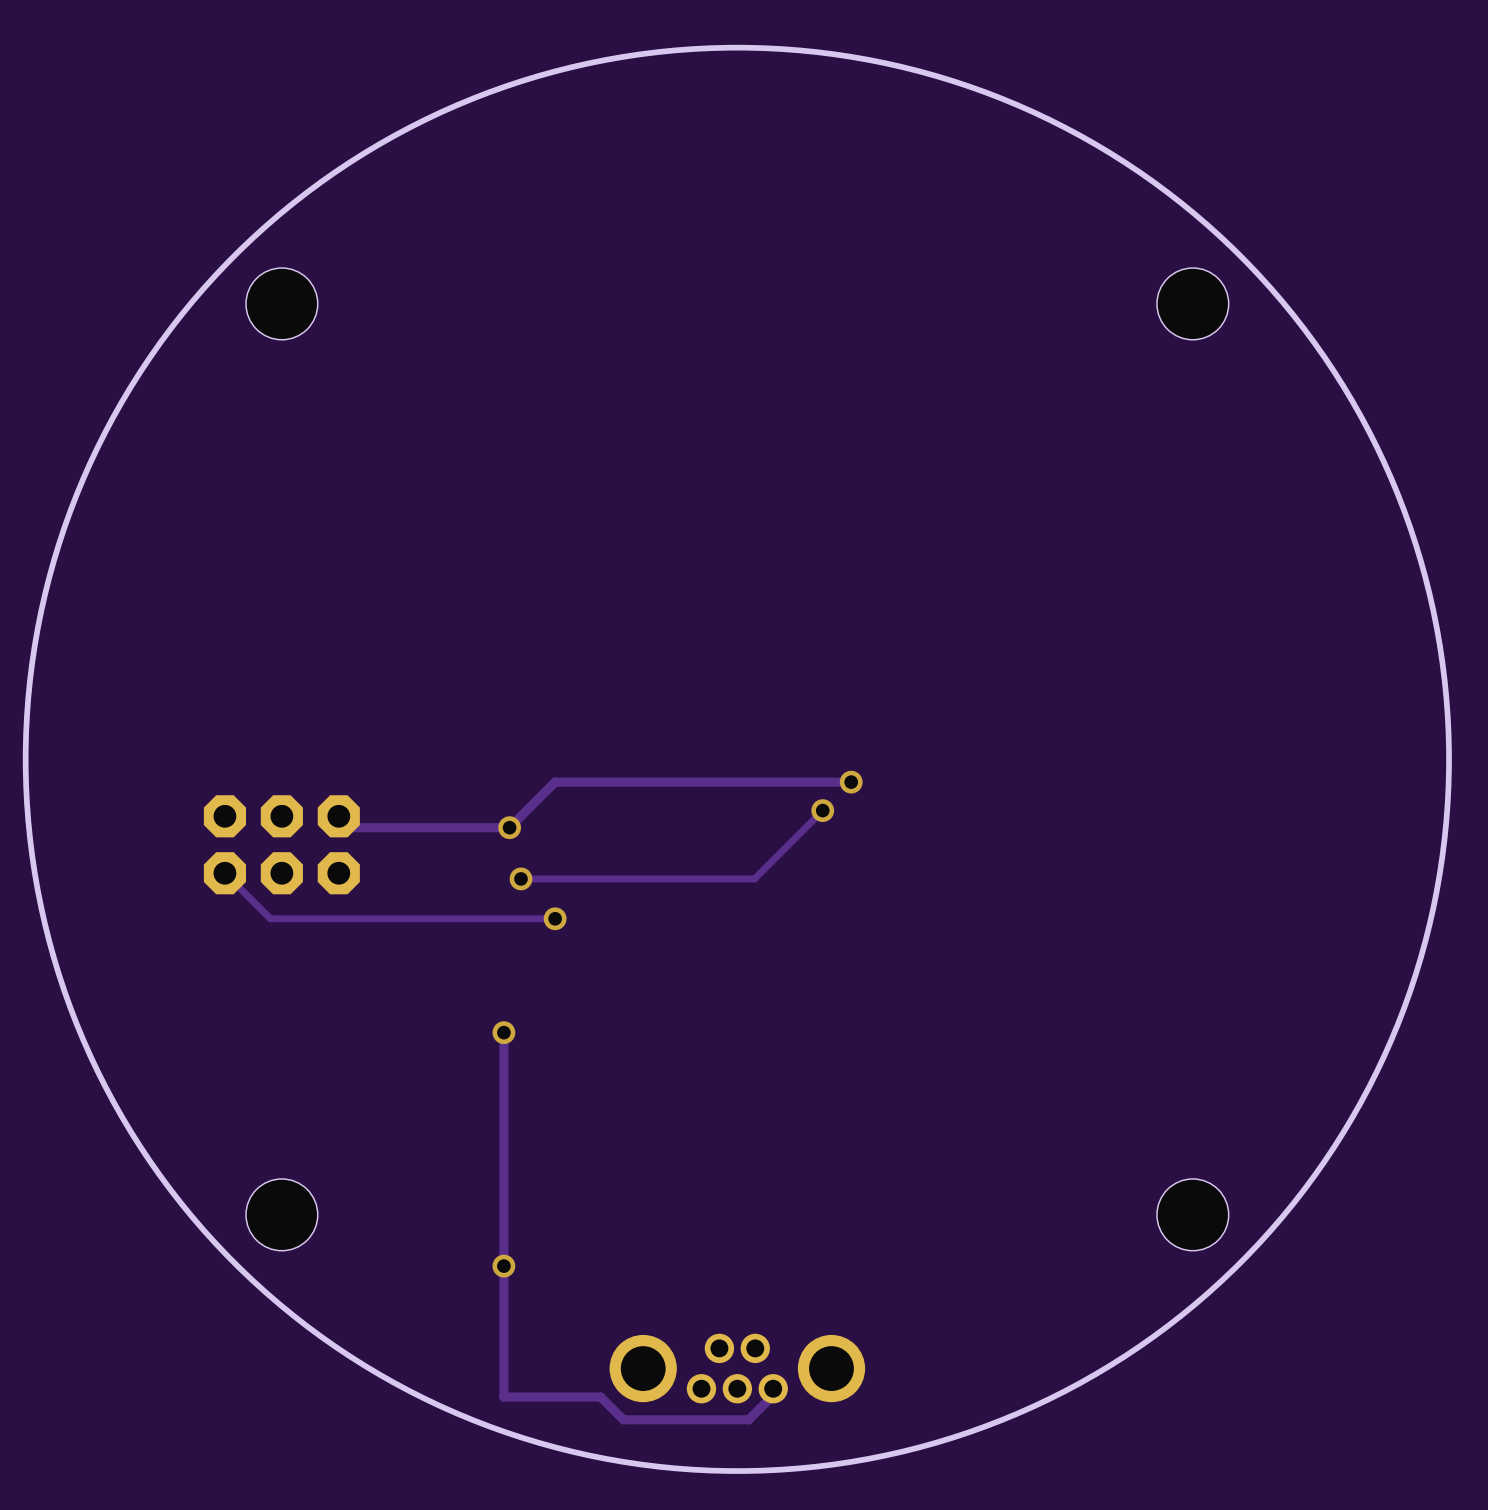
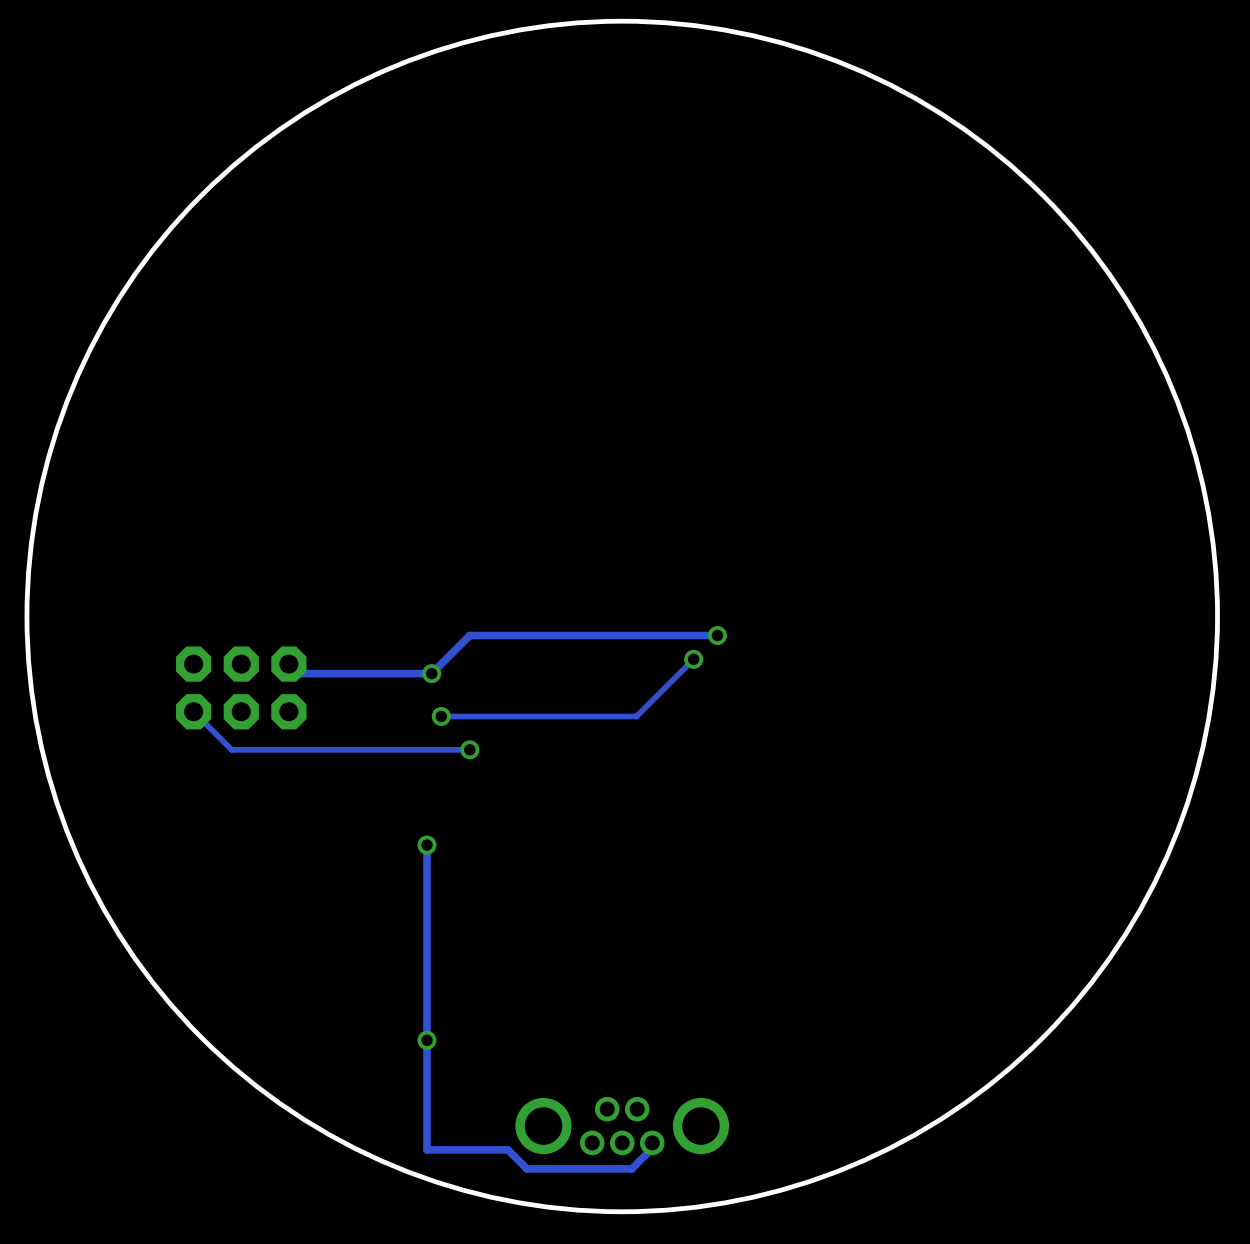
hole: (281, 303) -> none
hole: (1192, 303) -> none
hole: (281, 1214) -> none
hole: (1192, 1214) -> none

